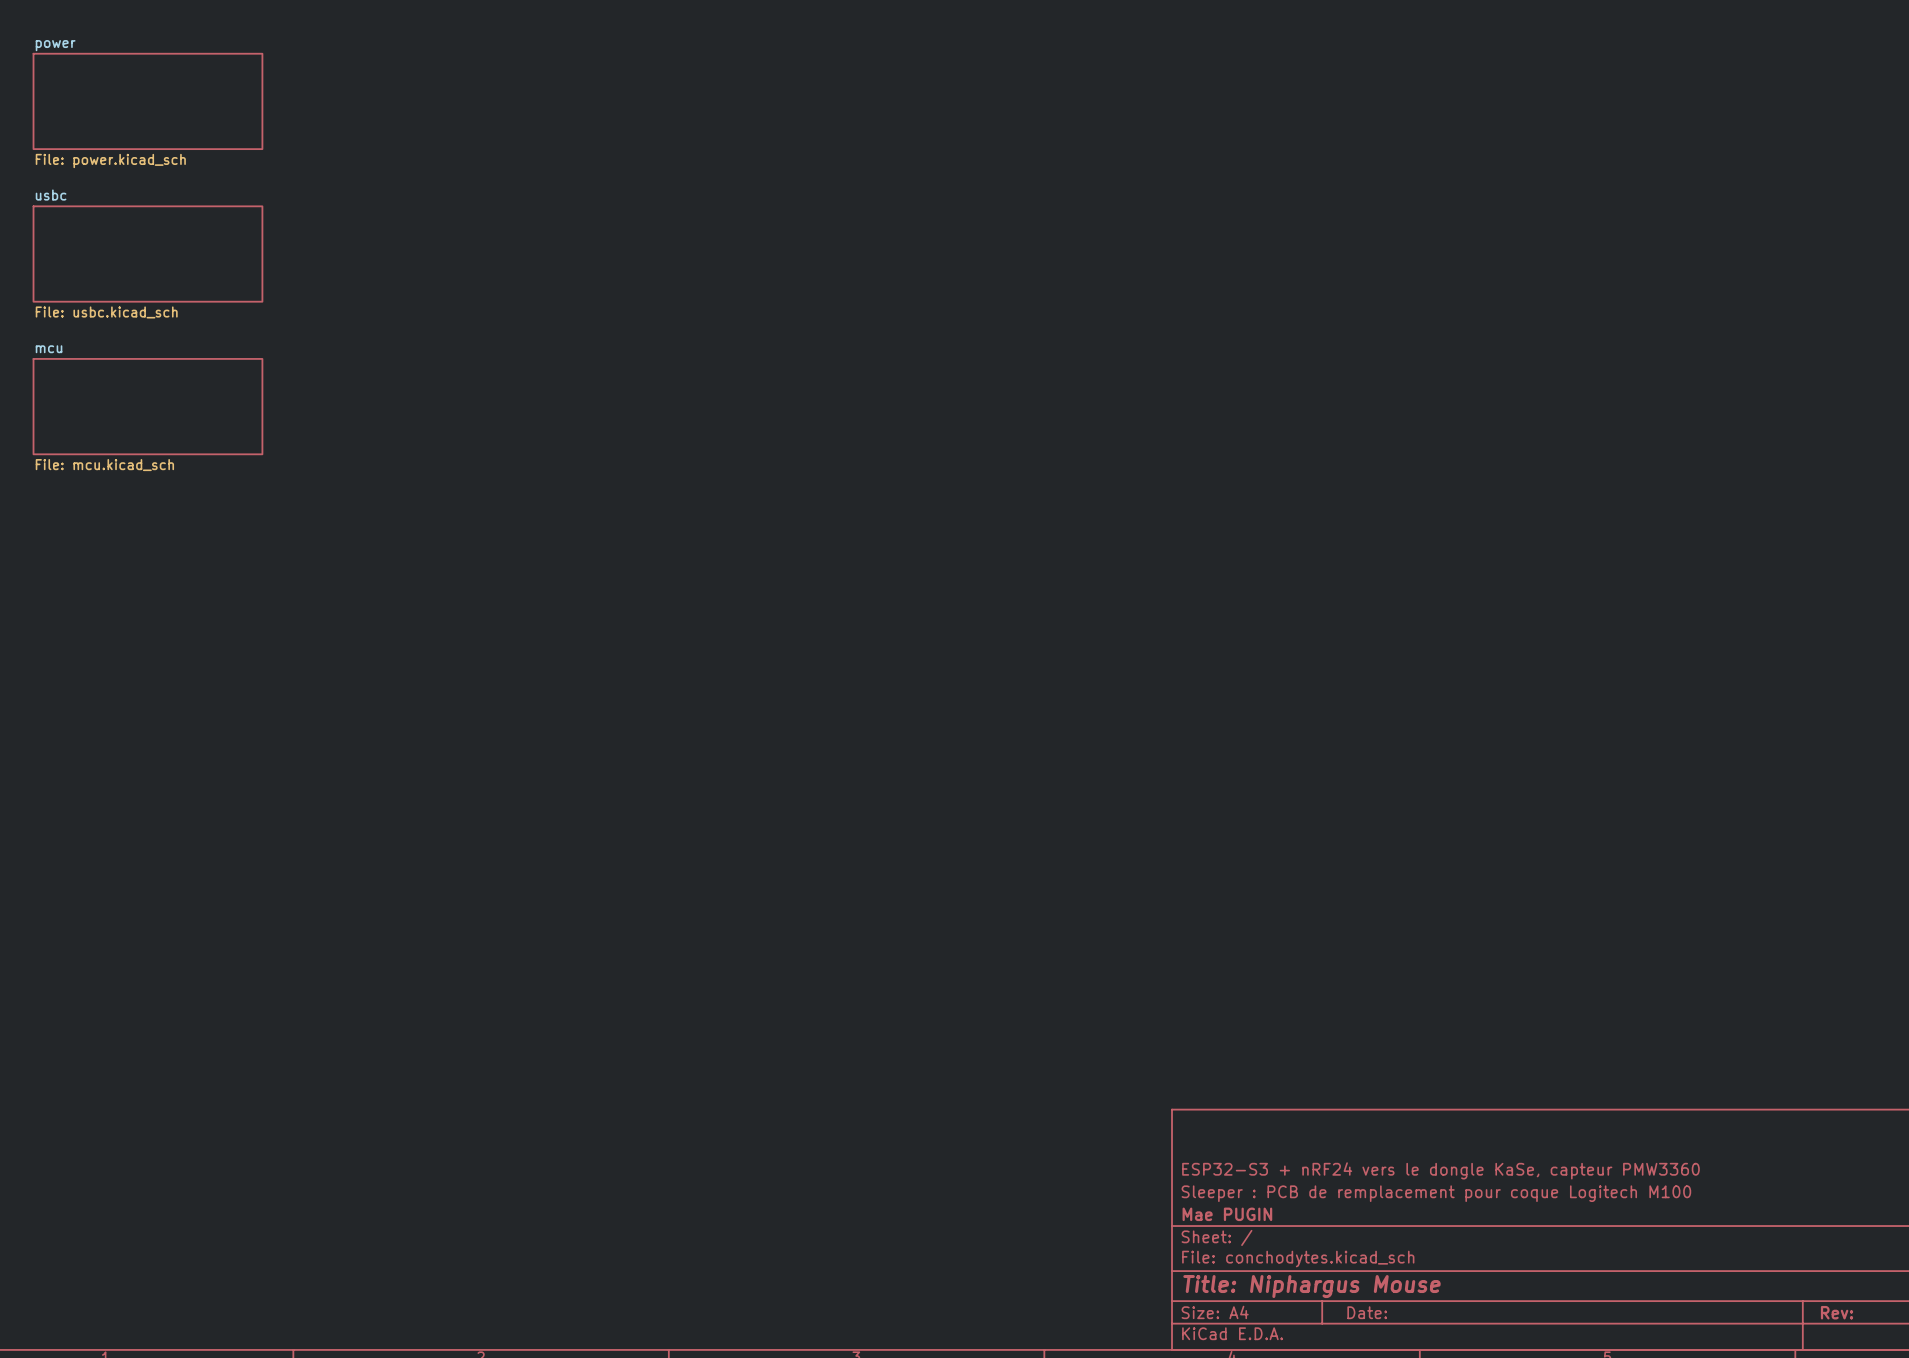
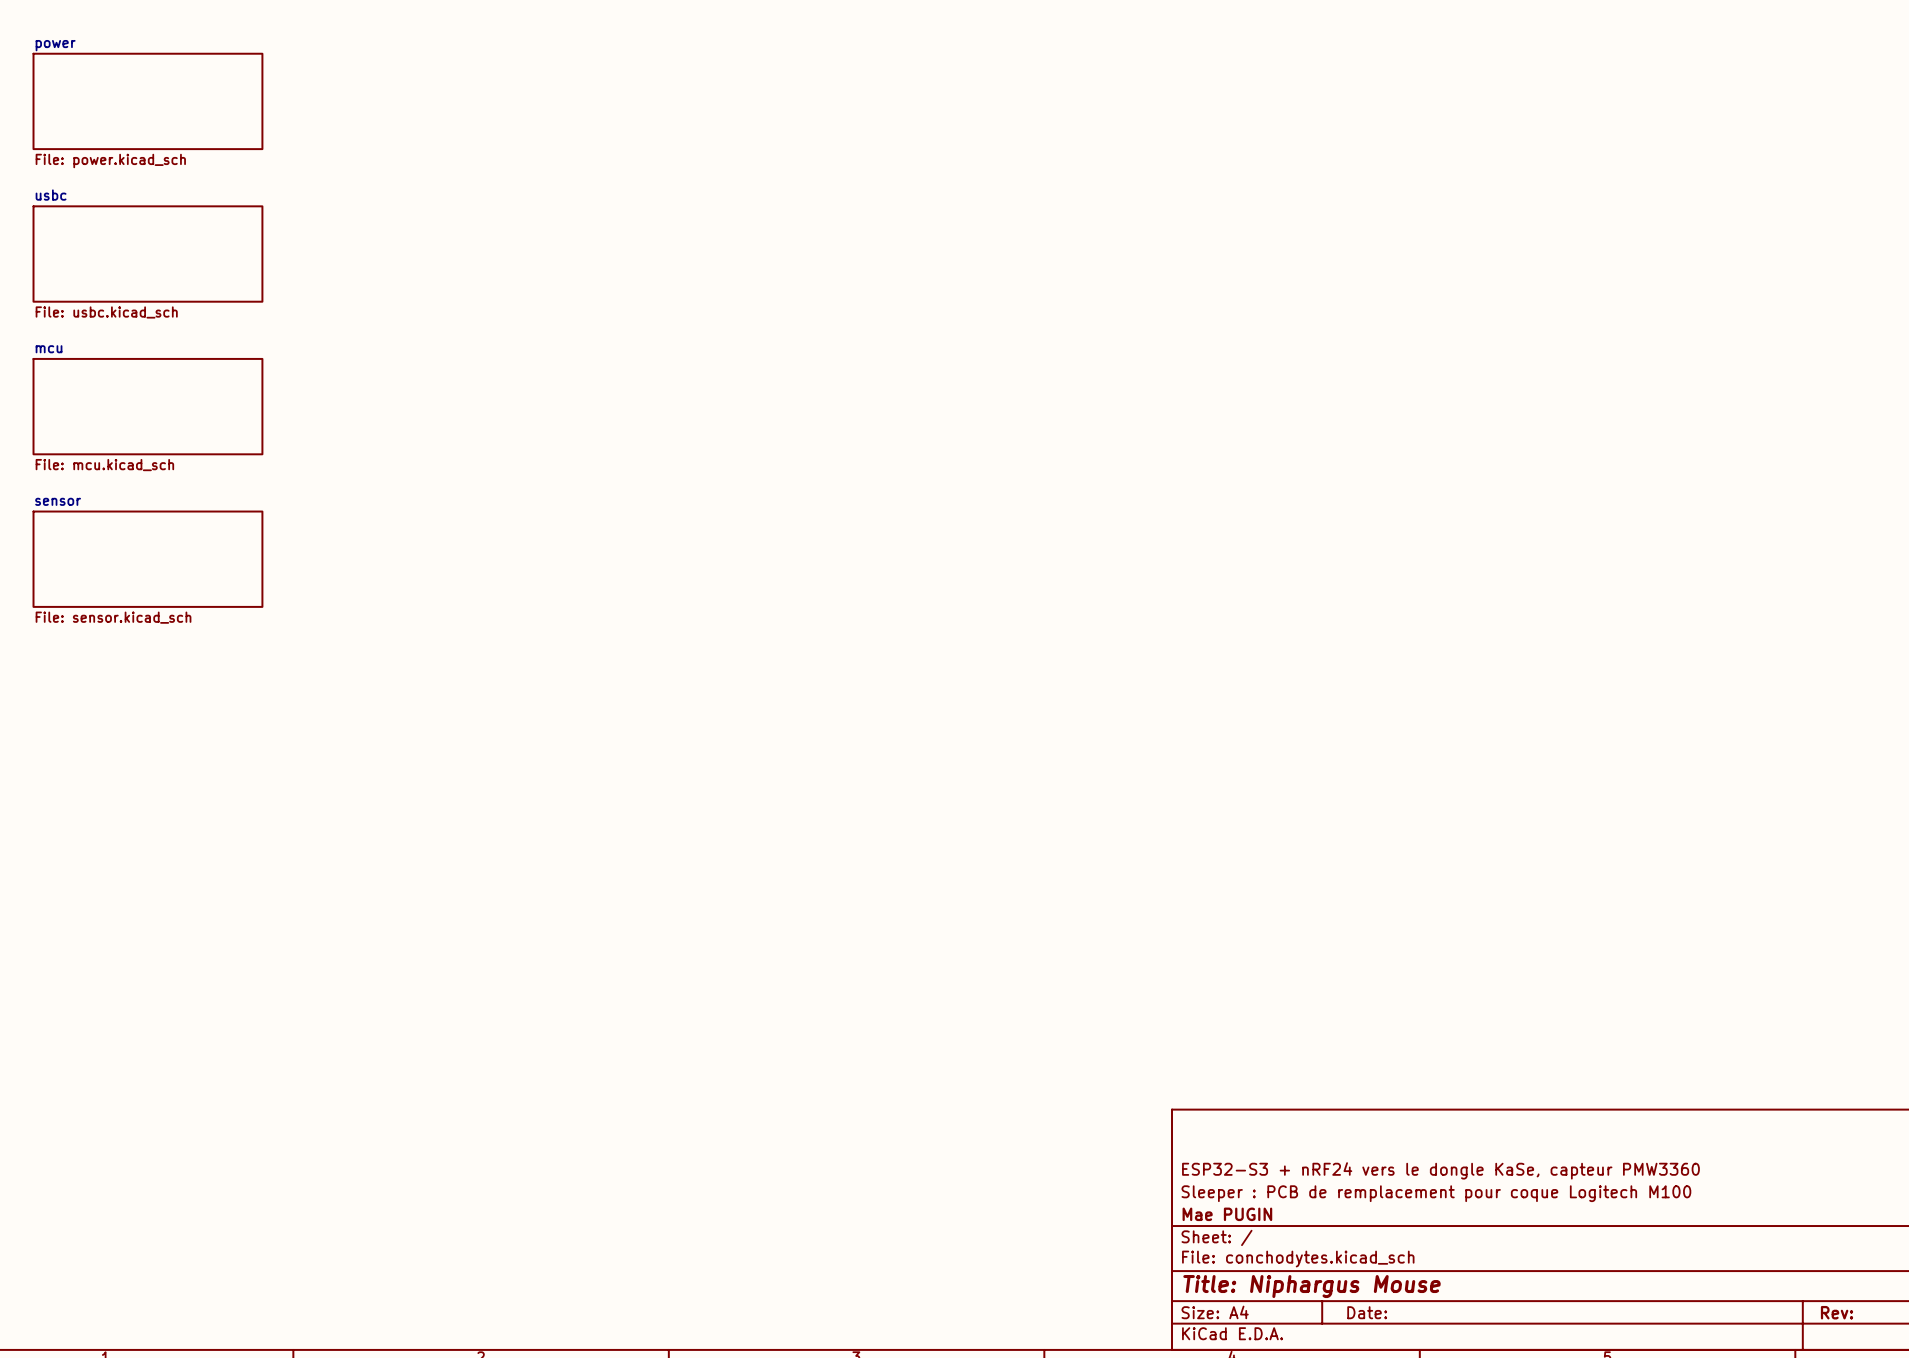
sheet sensor: none -> File: sensor.kicad_sch (147, 559)

